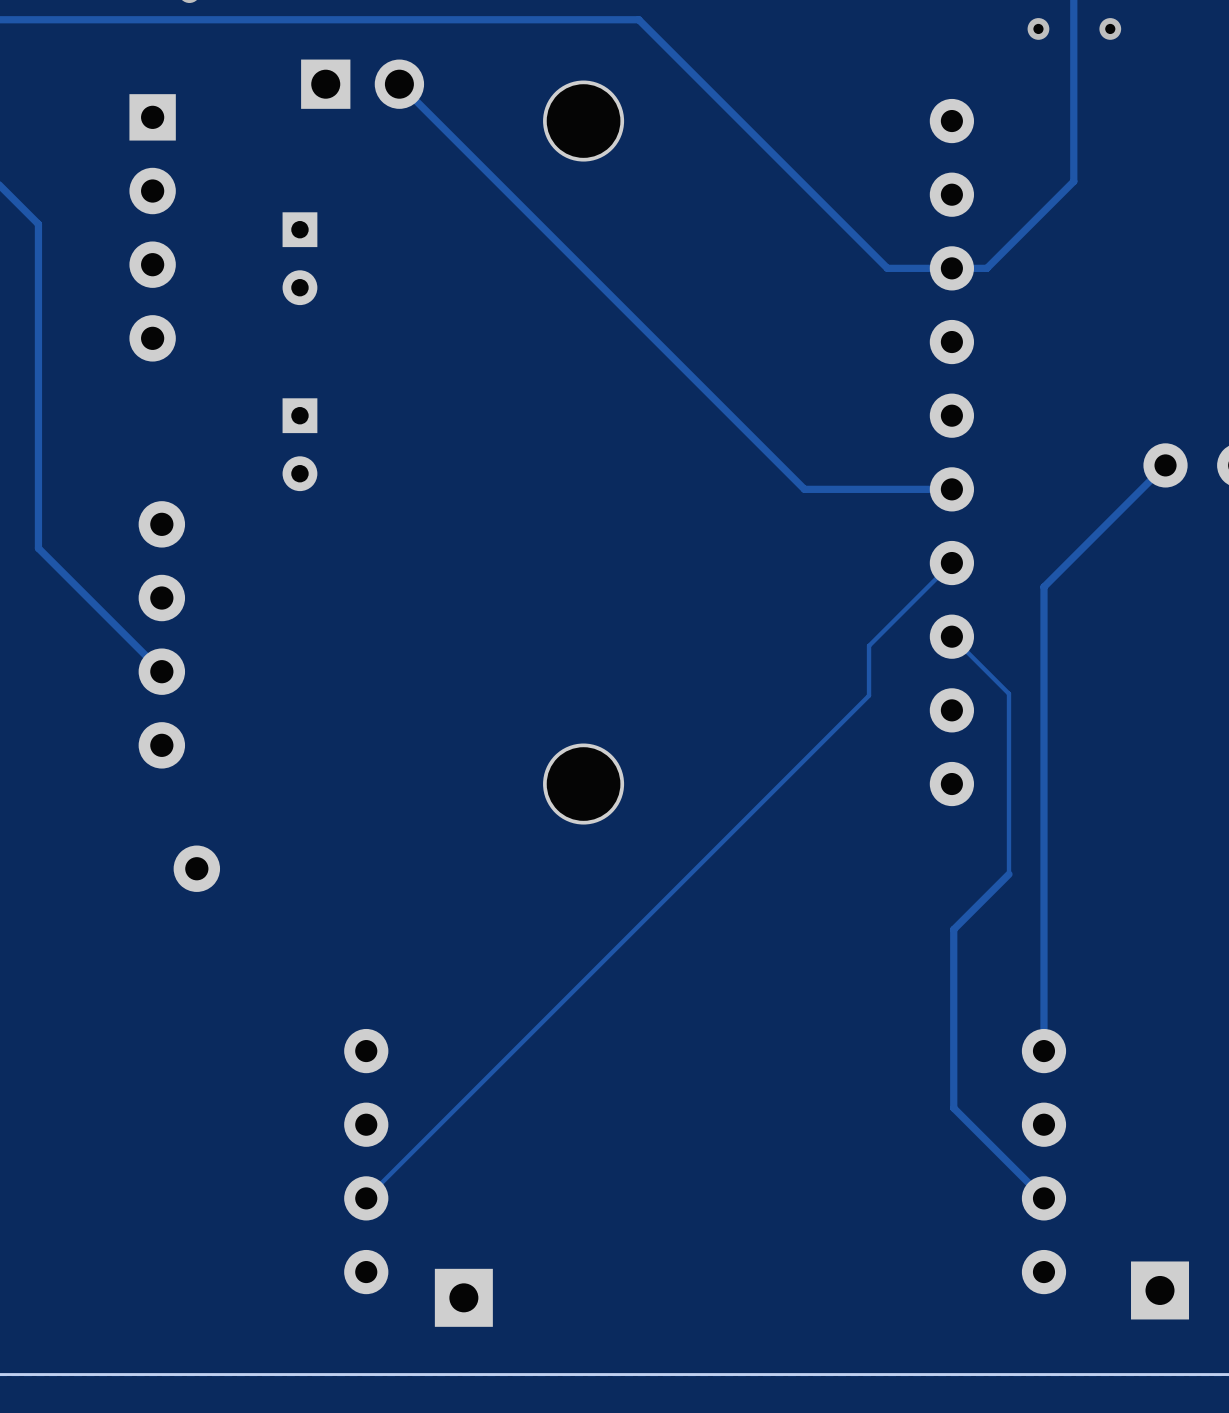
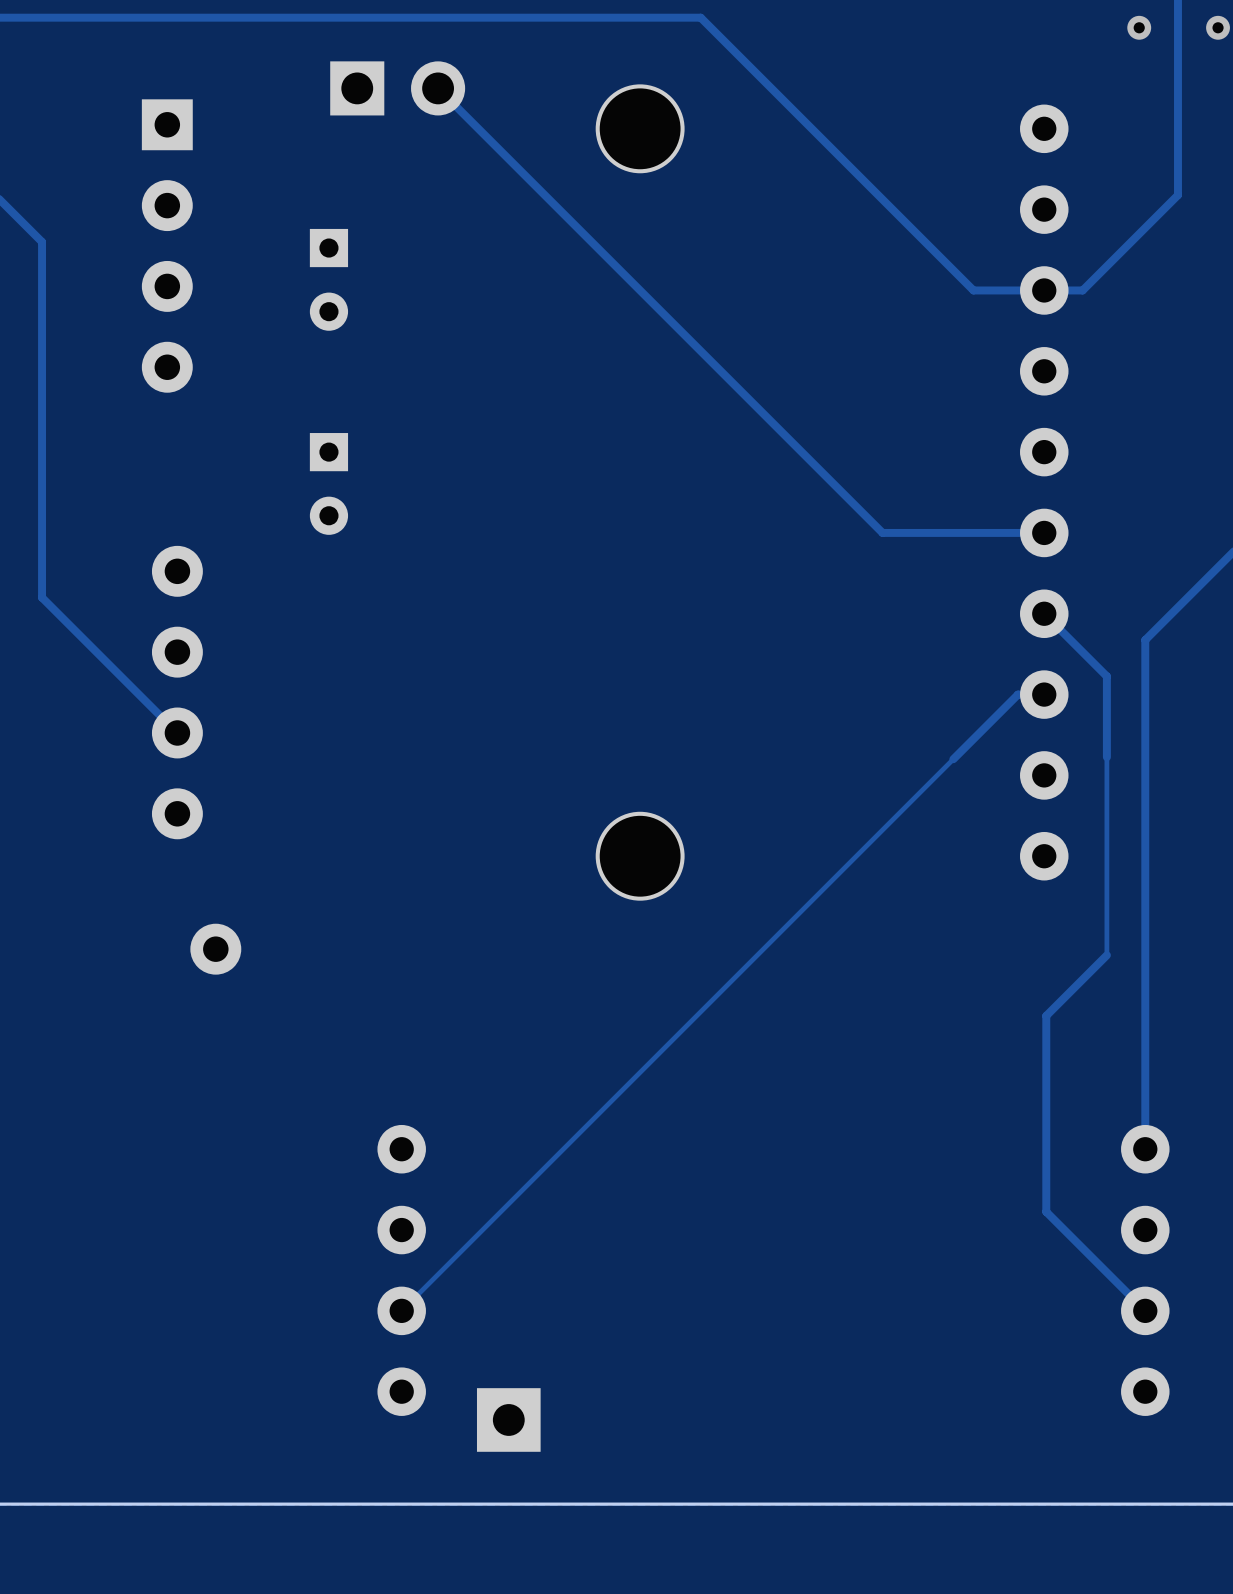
track: (951, 563) (869, 645) (869, 695) -> (1044, 694) (1017, 694) (953, 759)
track: (951, 636) (1008, 693) -> (1044, 613) (1106, 676) (1106, 757)

